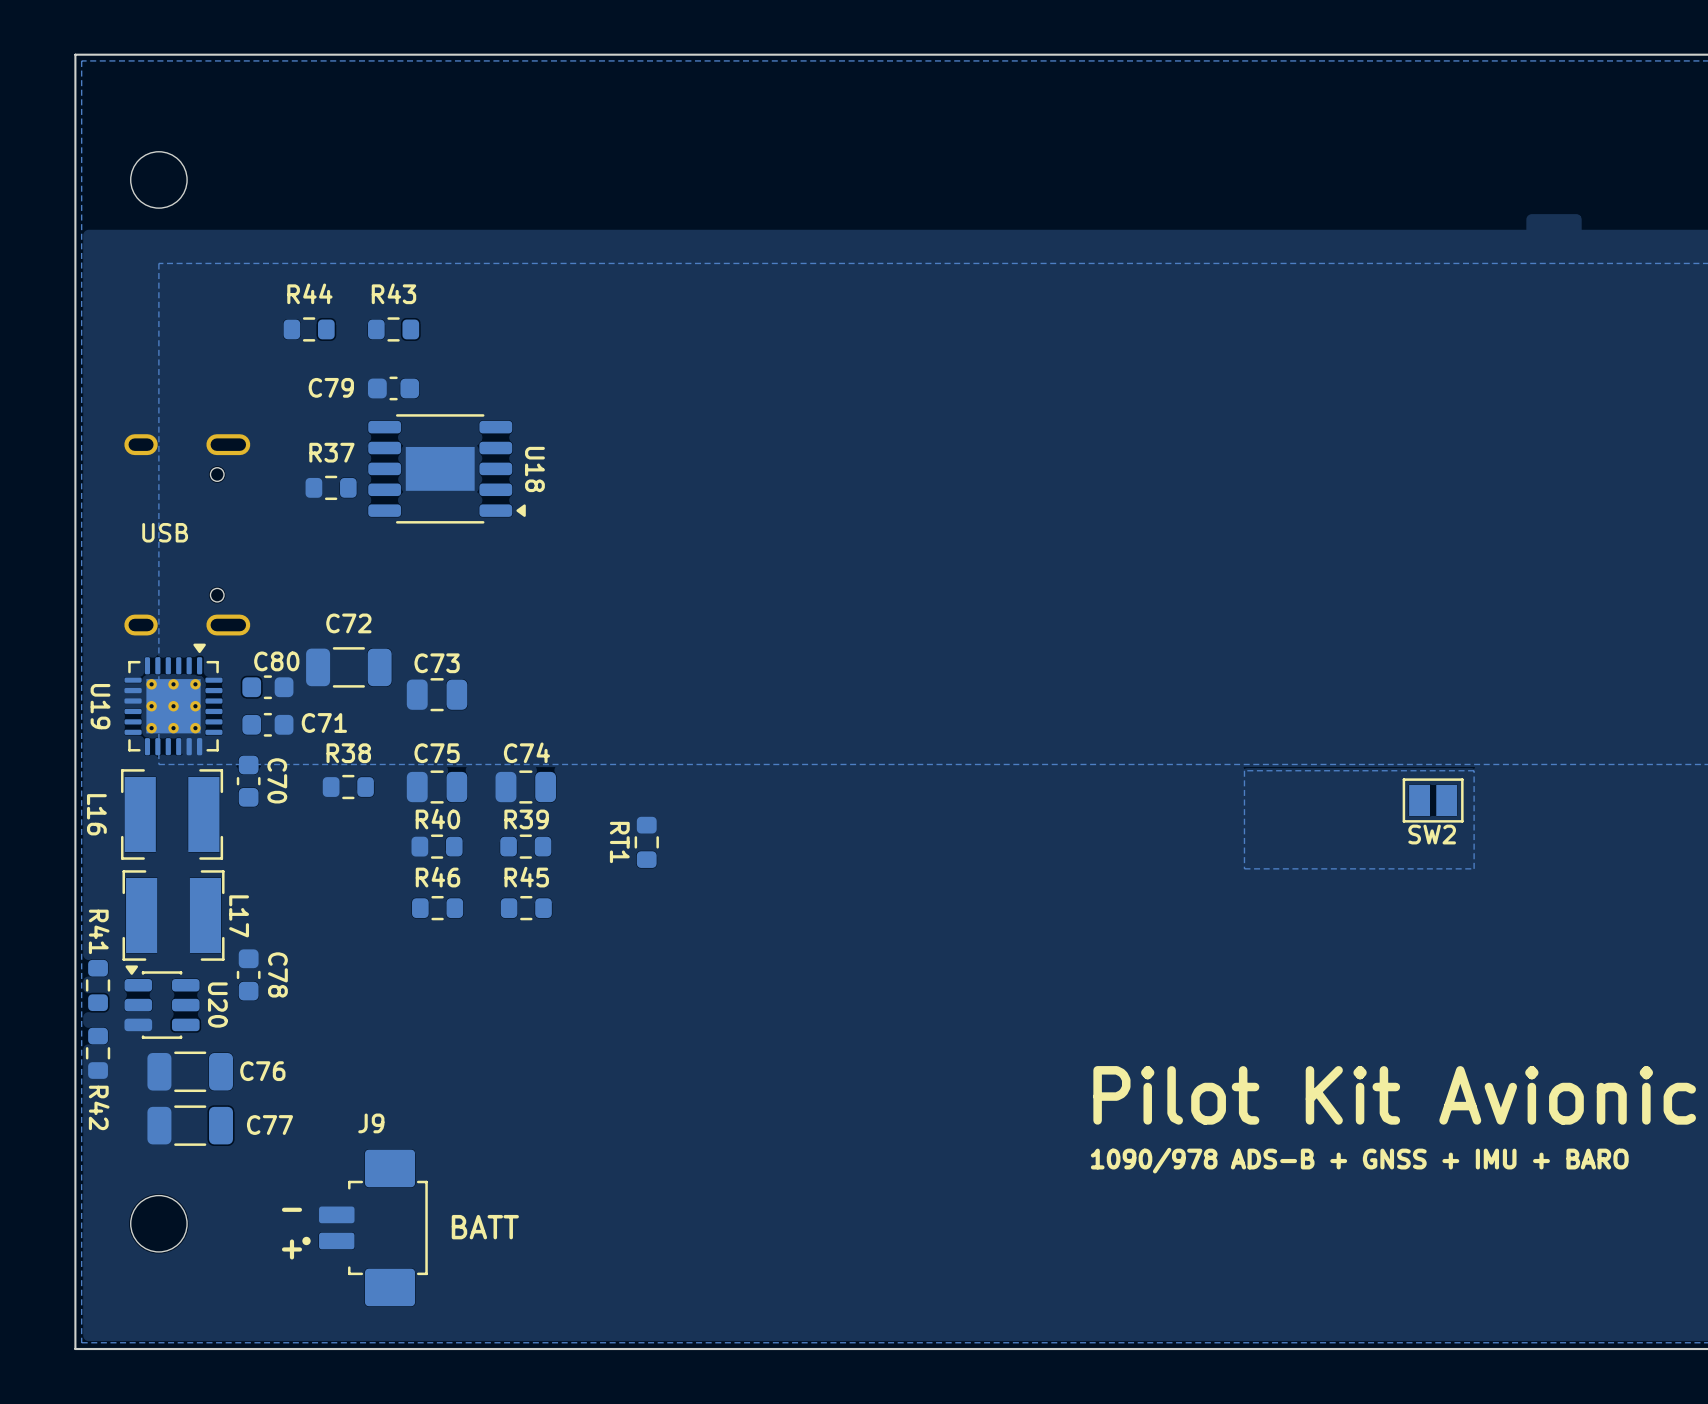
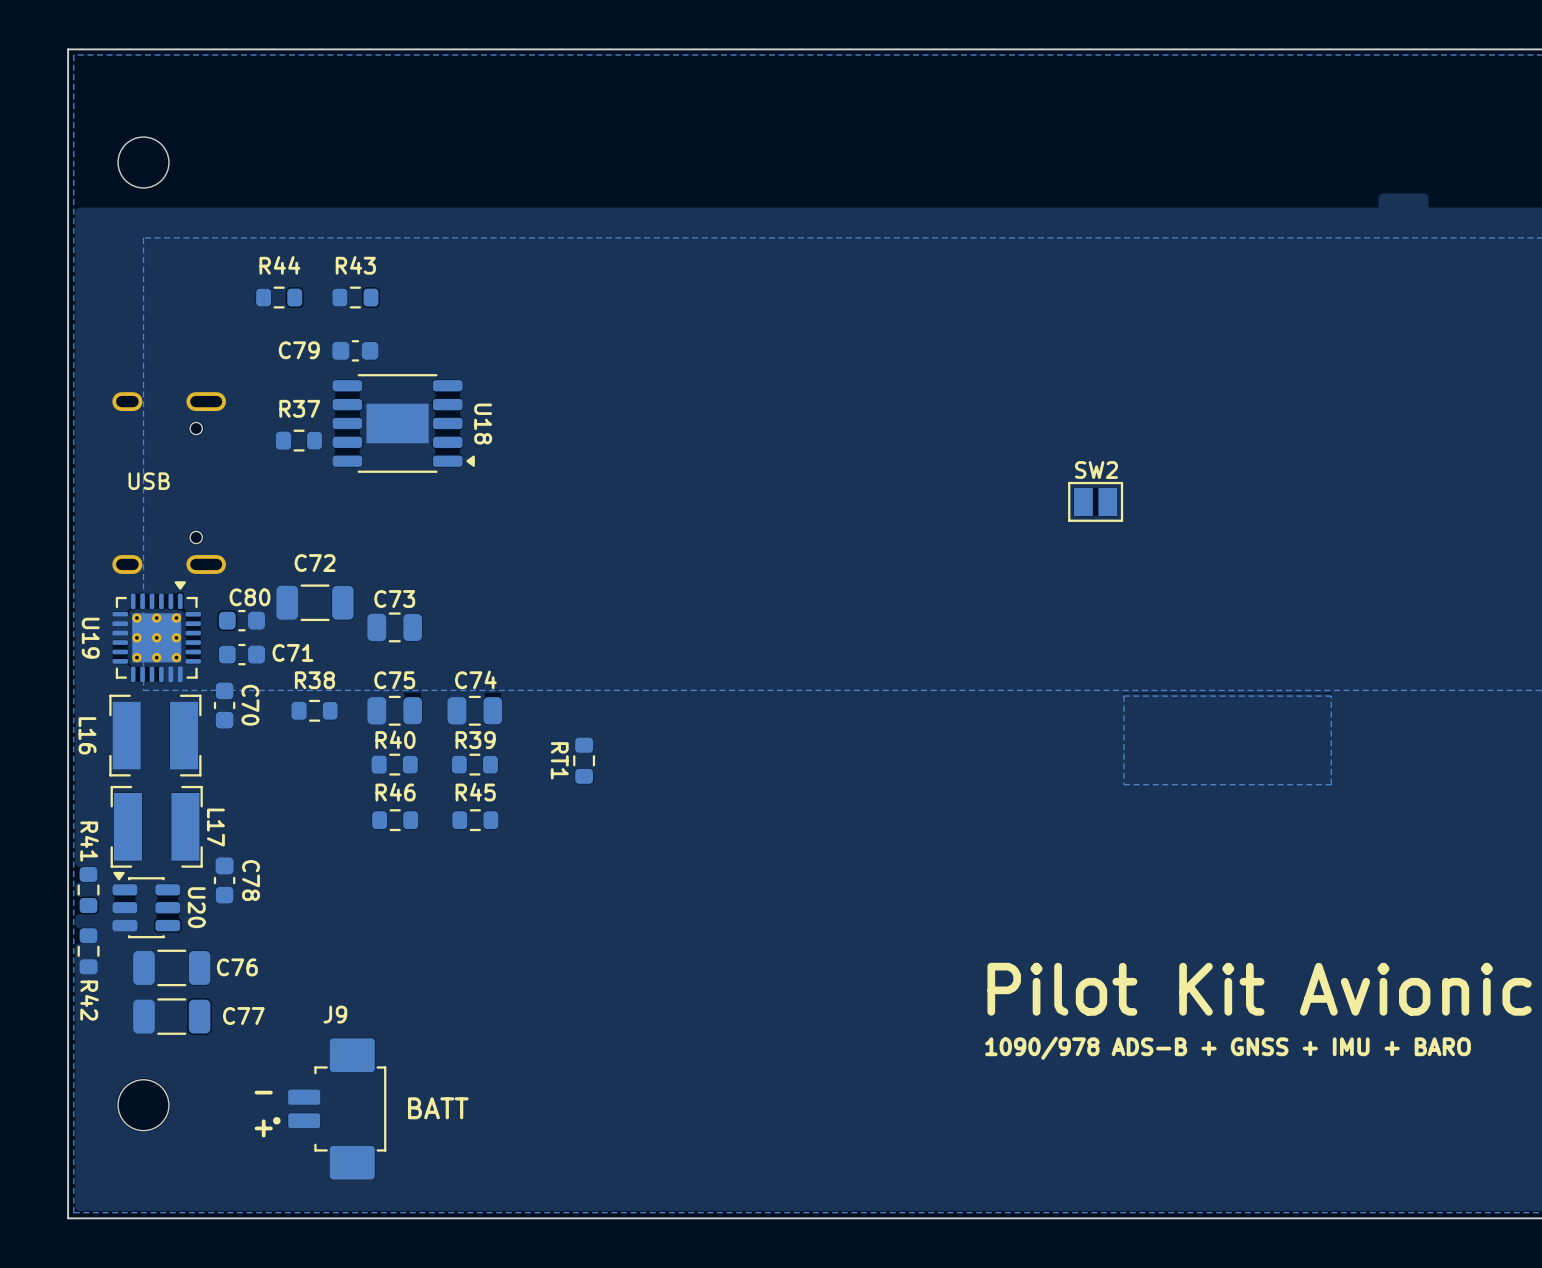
SW2 position: (1433, 800) -> (1095, 501)
SW2 name position: SW2 (1432, 834) -> SW2 (1096, 470)

